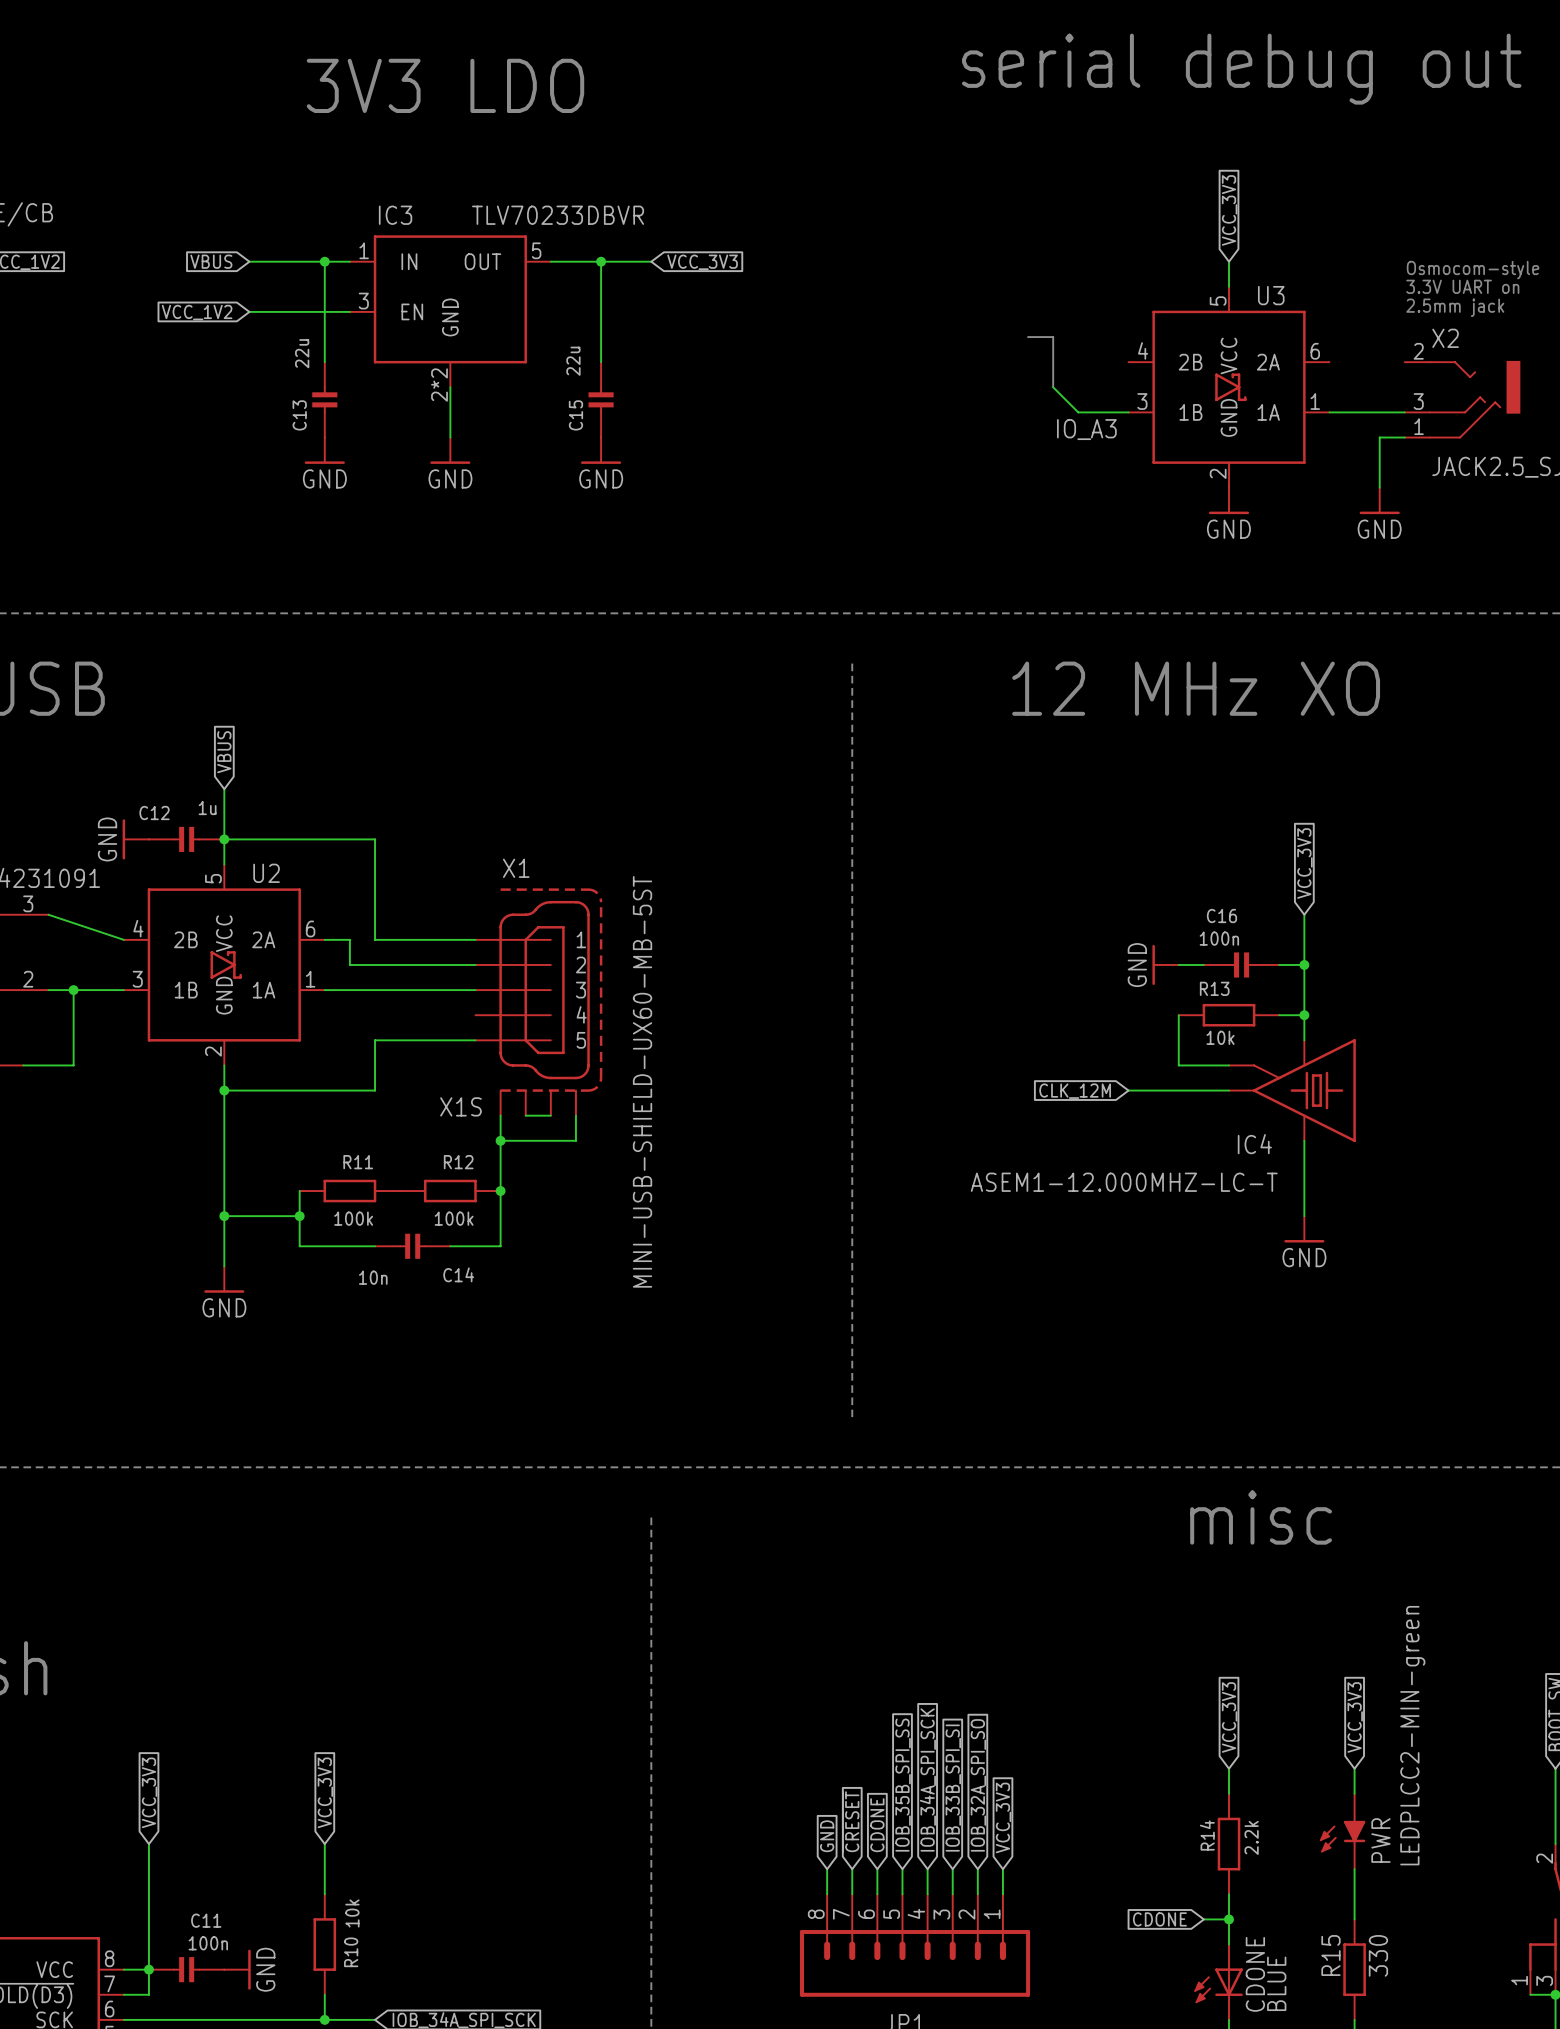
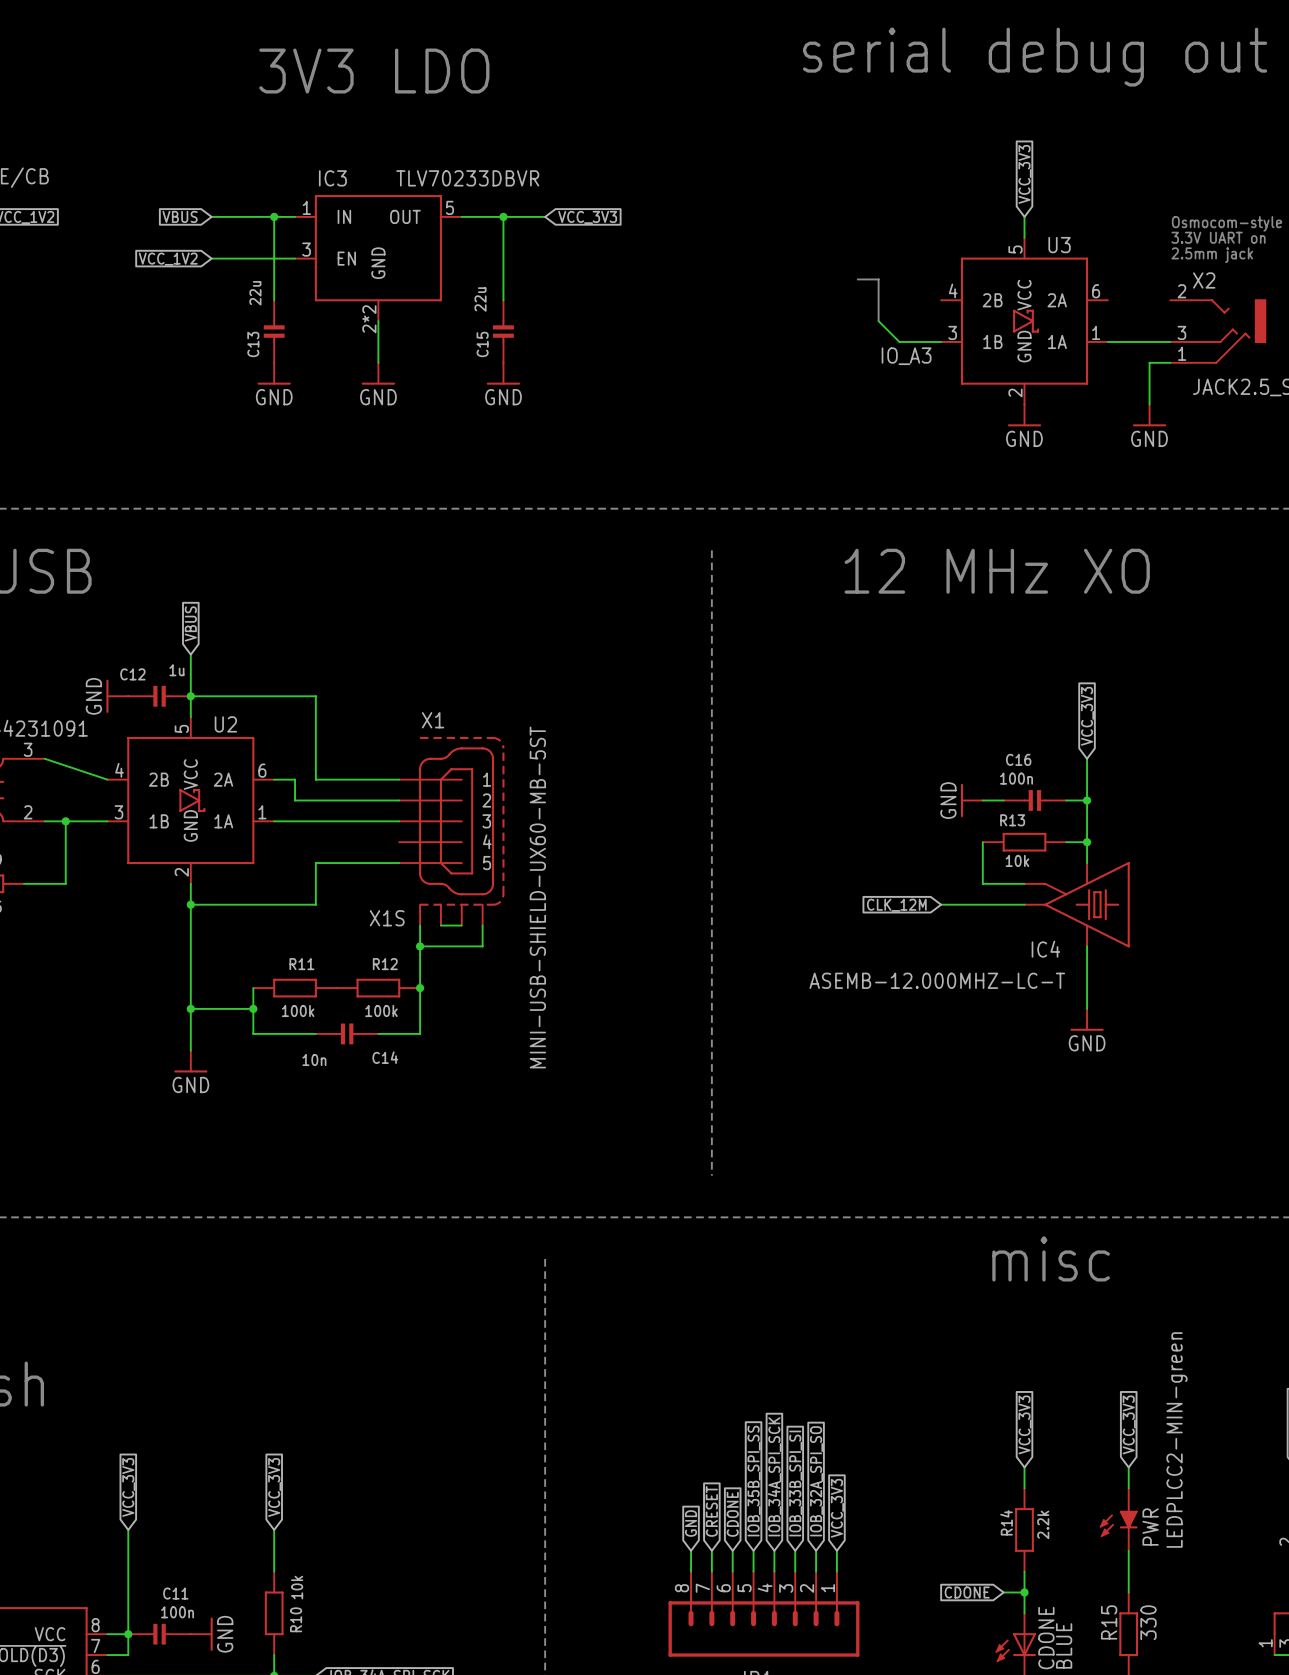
IC4 value: ASEM1-12.000MHZ-LC-T (1124, 1182) -> ASEMB-12.000MHZ-LC-T (937, 980)

